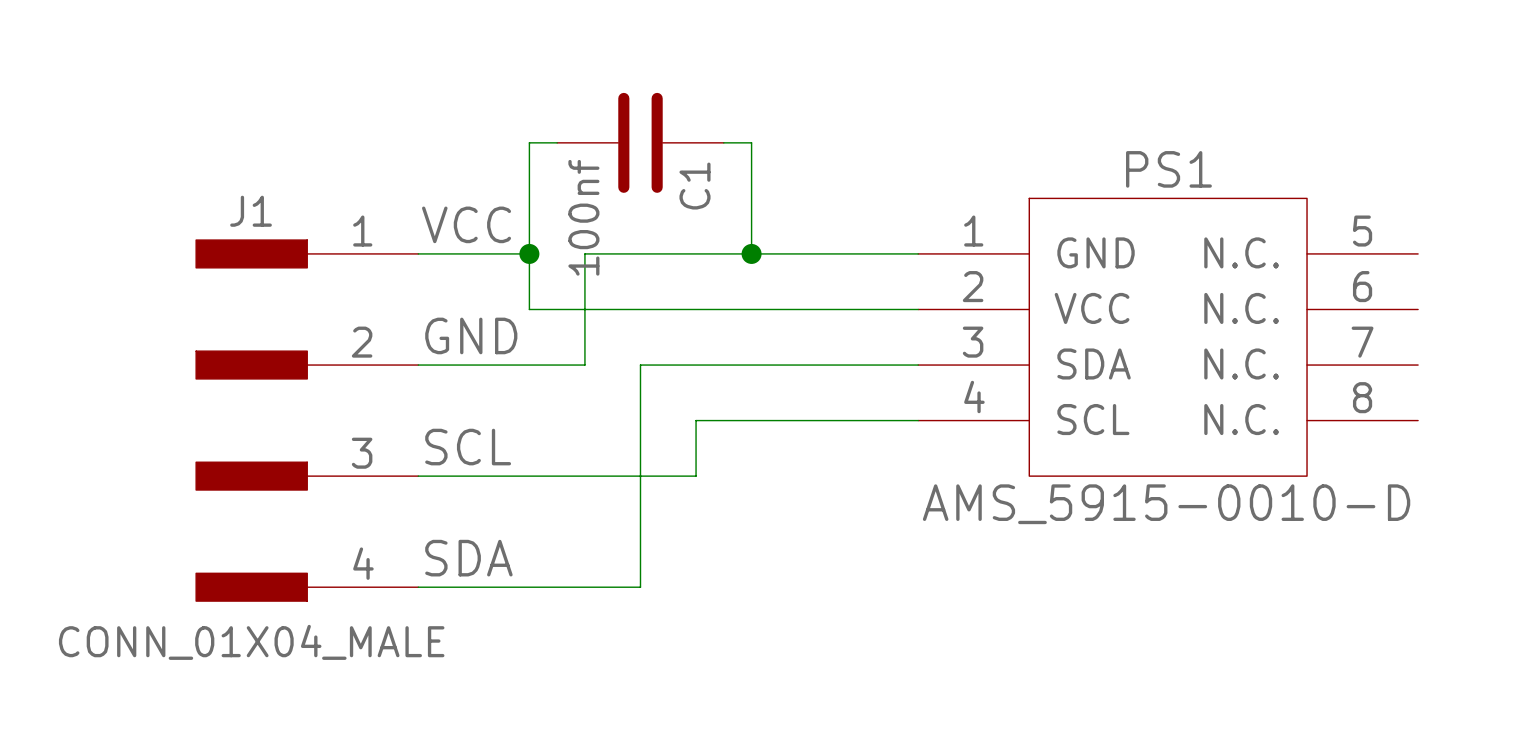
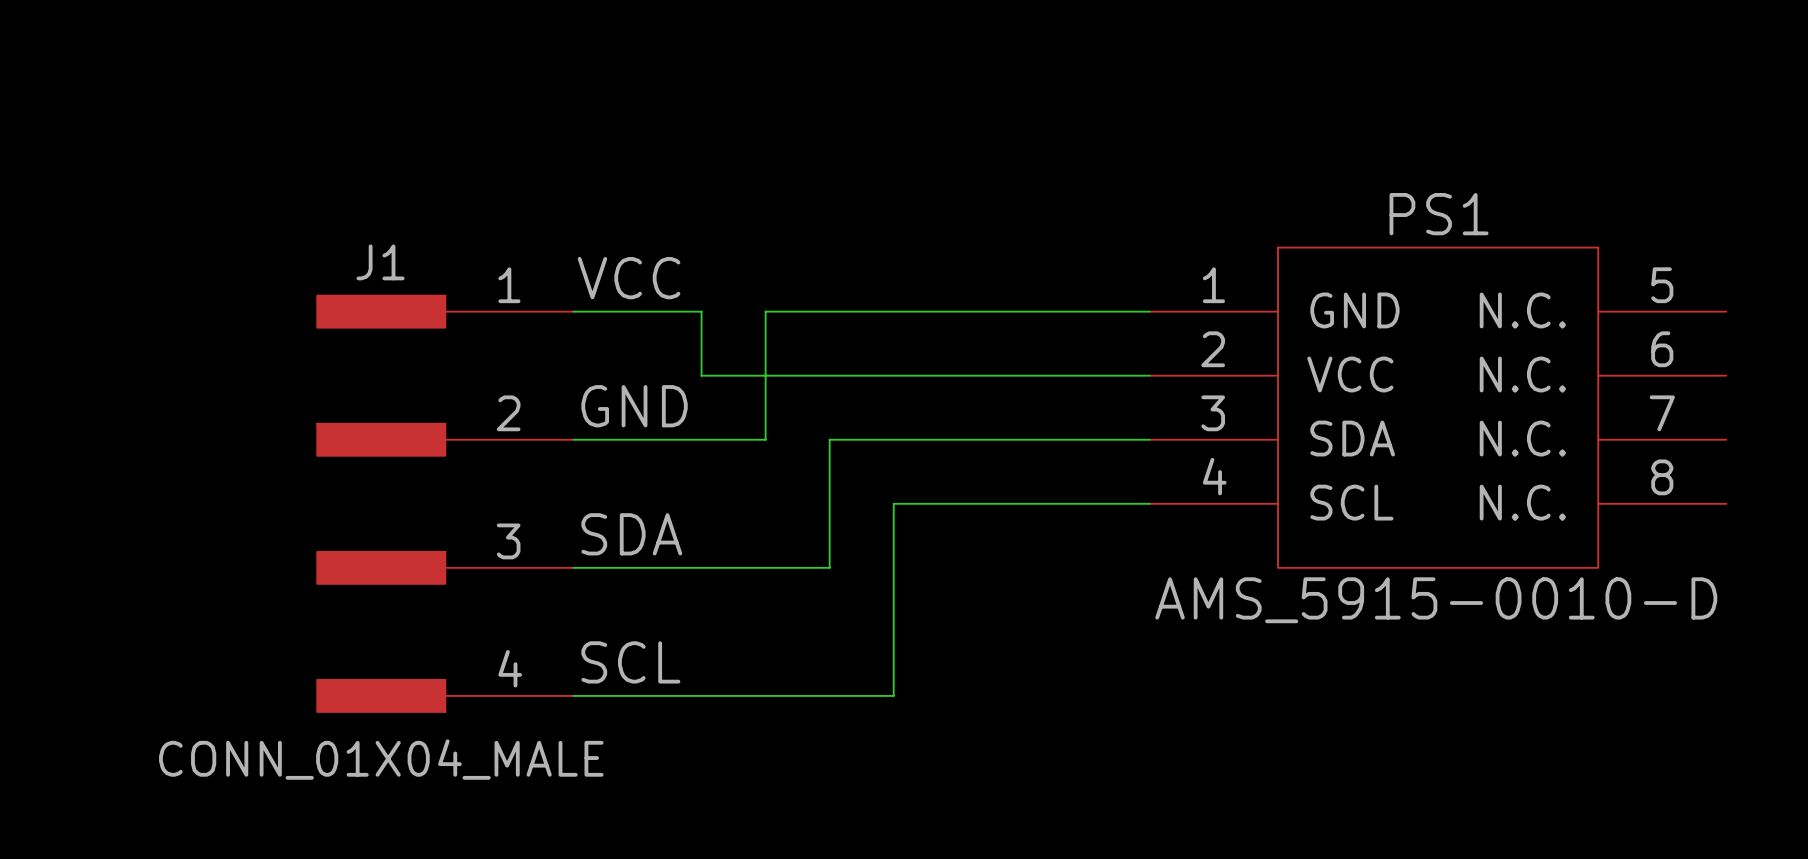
wire: (557, 142) (529, 142) (529, 253) -> none
C1: 100nf (640, 142) -> none
wire: (723, 142) (751, 142) (751, 253) -> none
junction: (529, 253) -> none
junction: (751, 253) -> none
label: SCL (468, 447) -> SDA (631, 534)
wire: (696, 476) (640, 476) (640, 587) -> (893, 567) (893, 695) (829, 695)
label: SDA (468, 558) -> SCL (630, 662)

